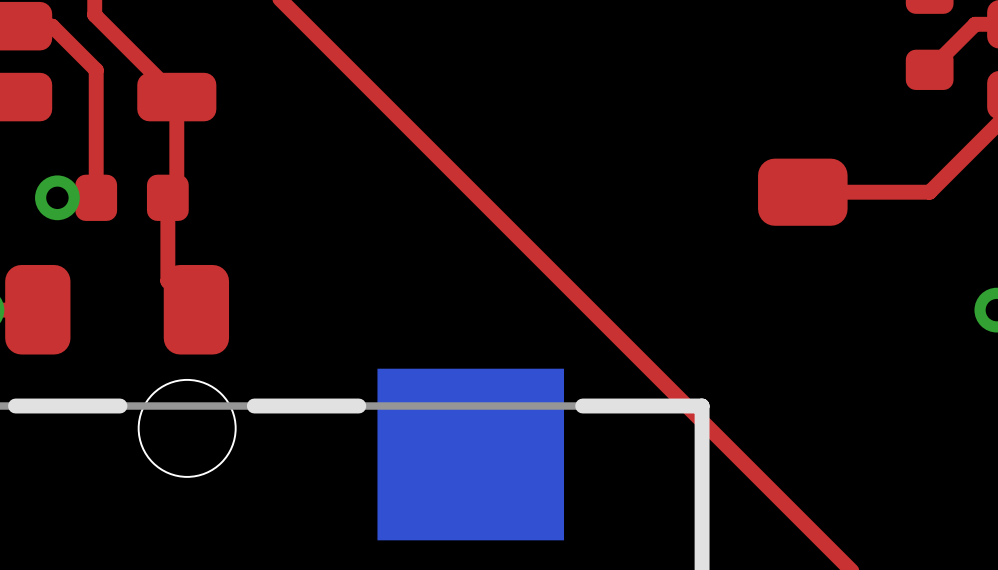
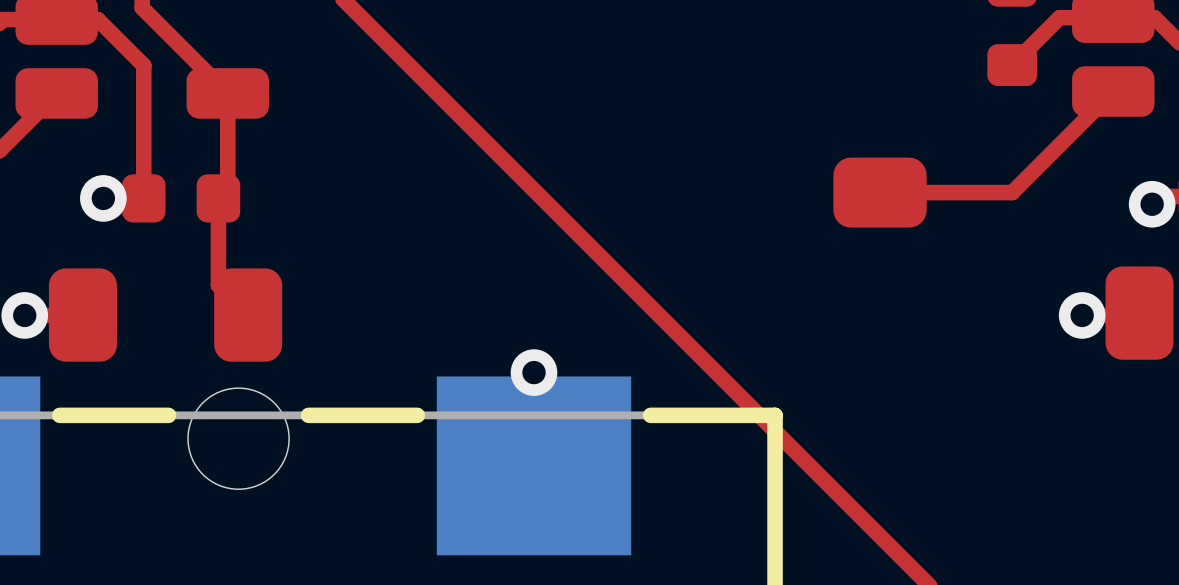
via: none -> (534, 372)

